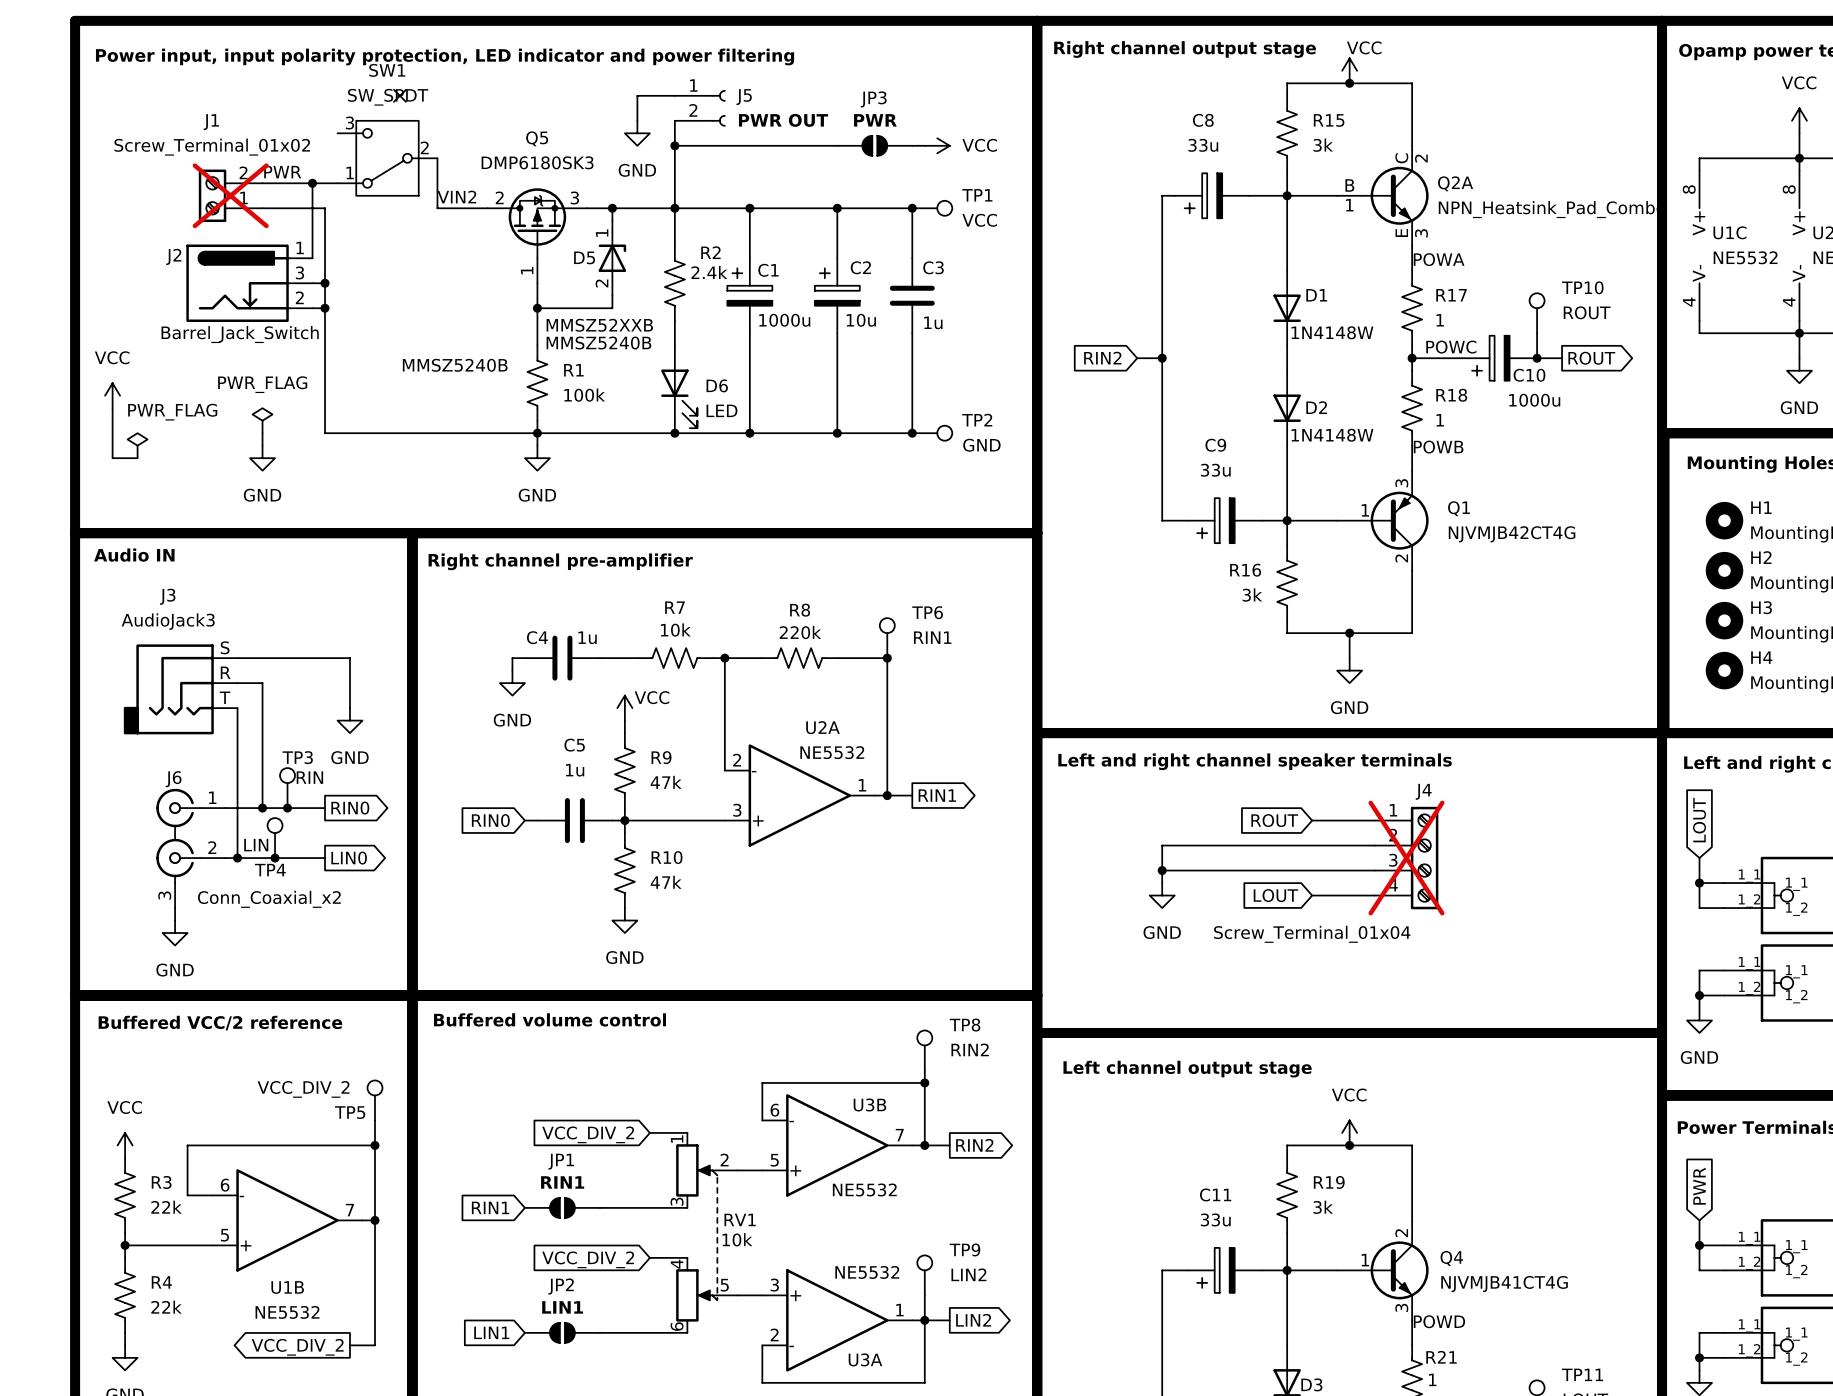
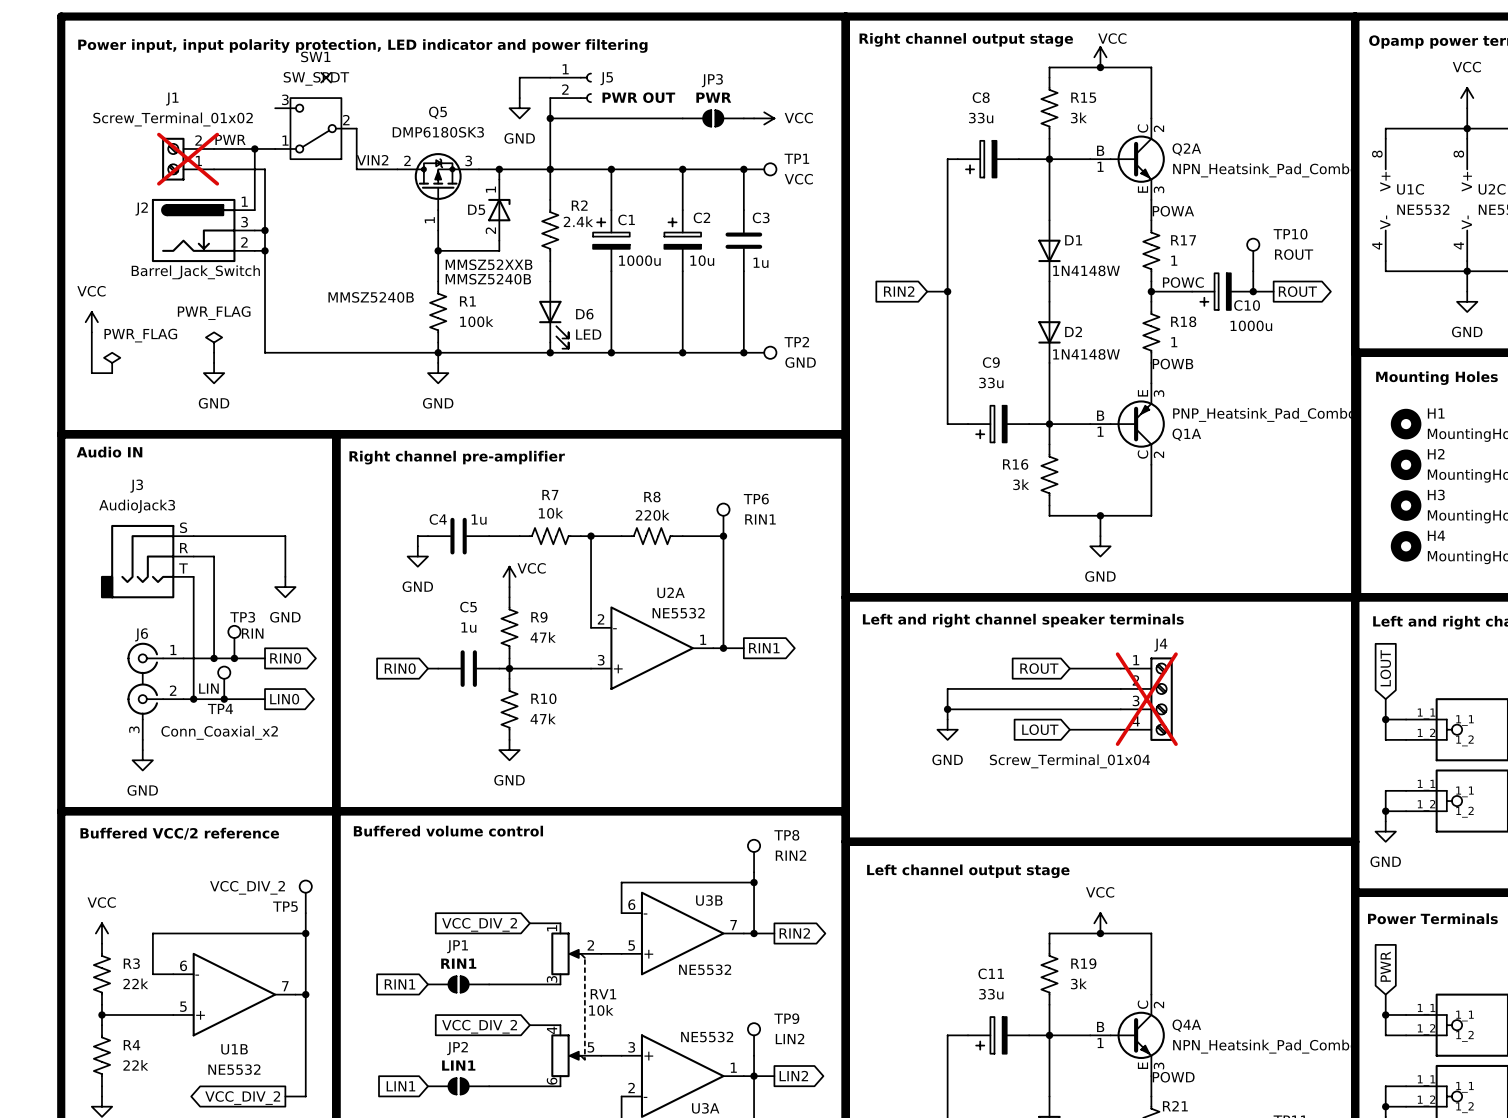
Q1: NJVMJB42CT4G (1382, 520) -> none
Q1A: none -> PNP_Heatsink_Pad_Combo (1127, 424)
Q4: NJVMJB41CT4G (1382, 1270) -> none
Q4A: none -> NPN_Heatsink_Pad_Combo (1127, 1035)

